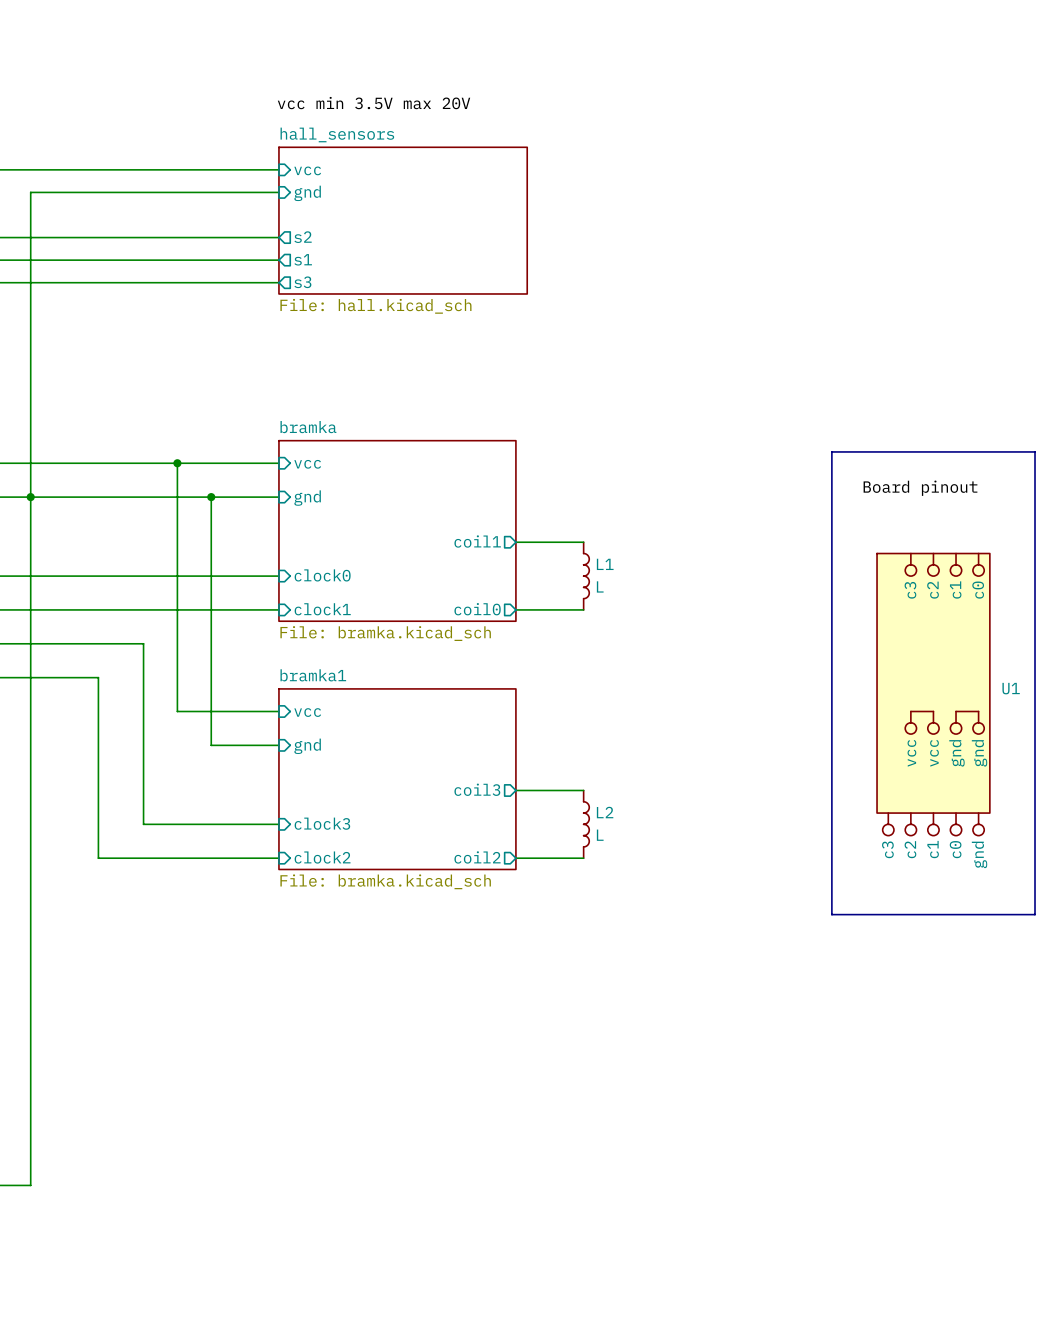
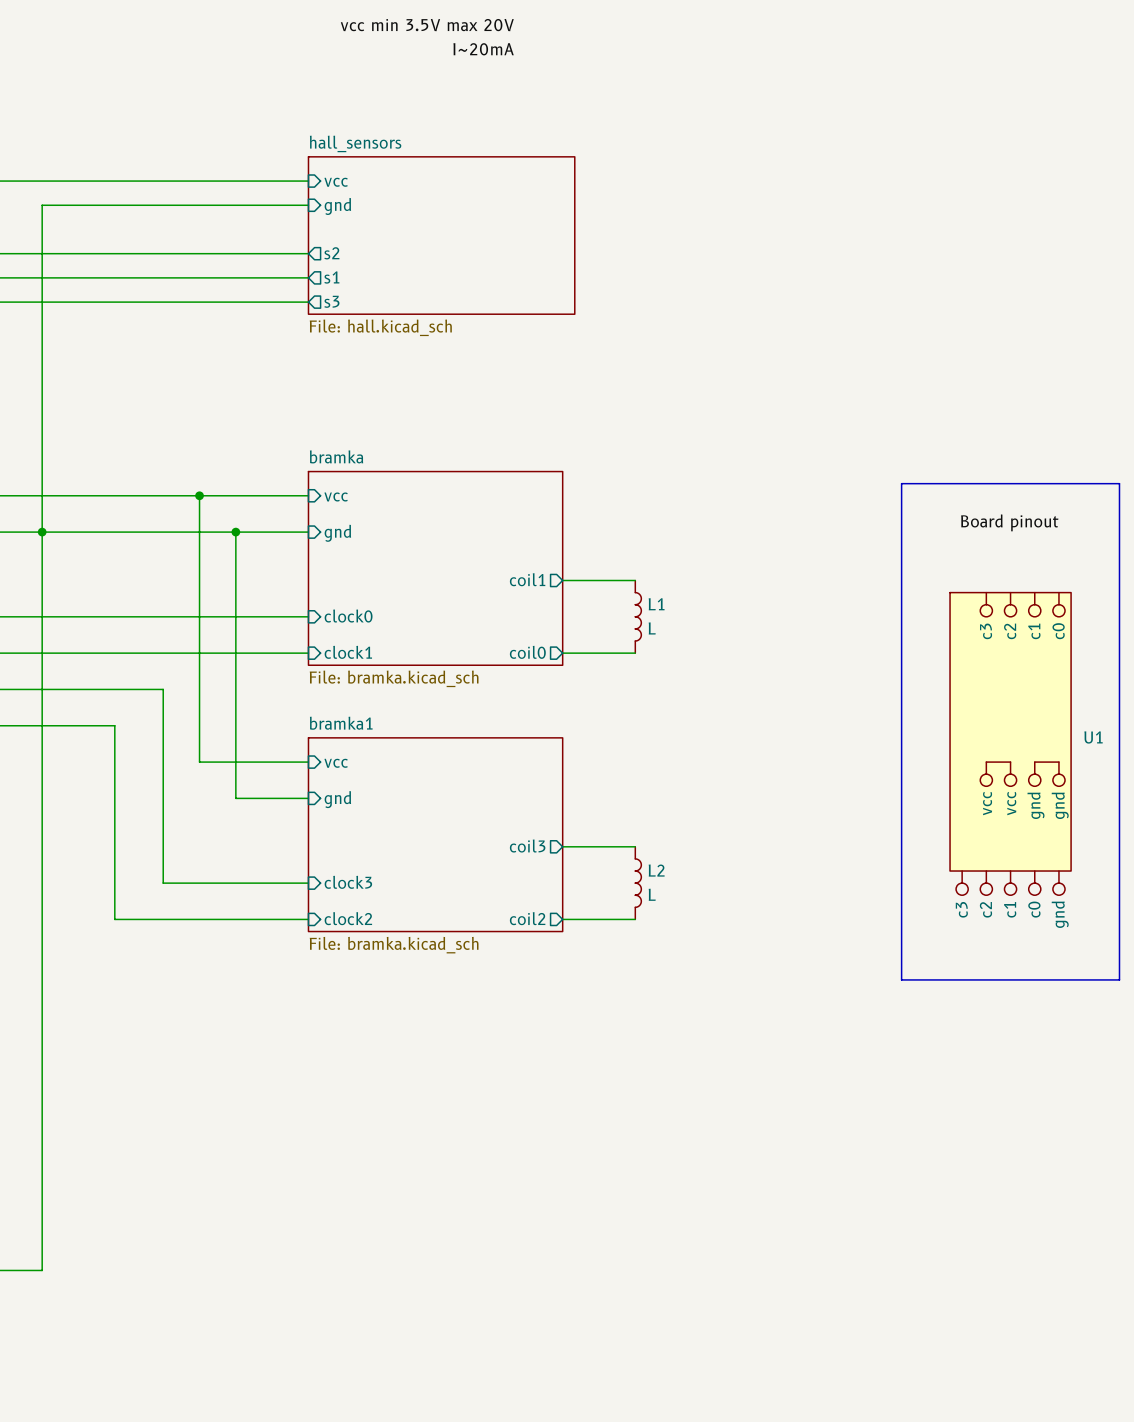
label: none -> I~20mA (483, 49)
label position: vcc min 3.5V max 20V (374, 103) -> vcc min 3.5V max 20V (427, 25)

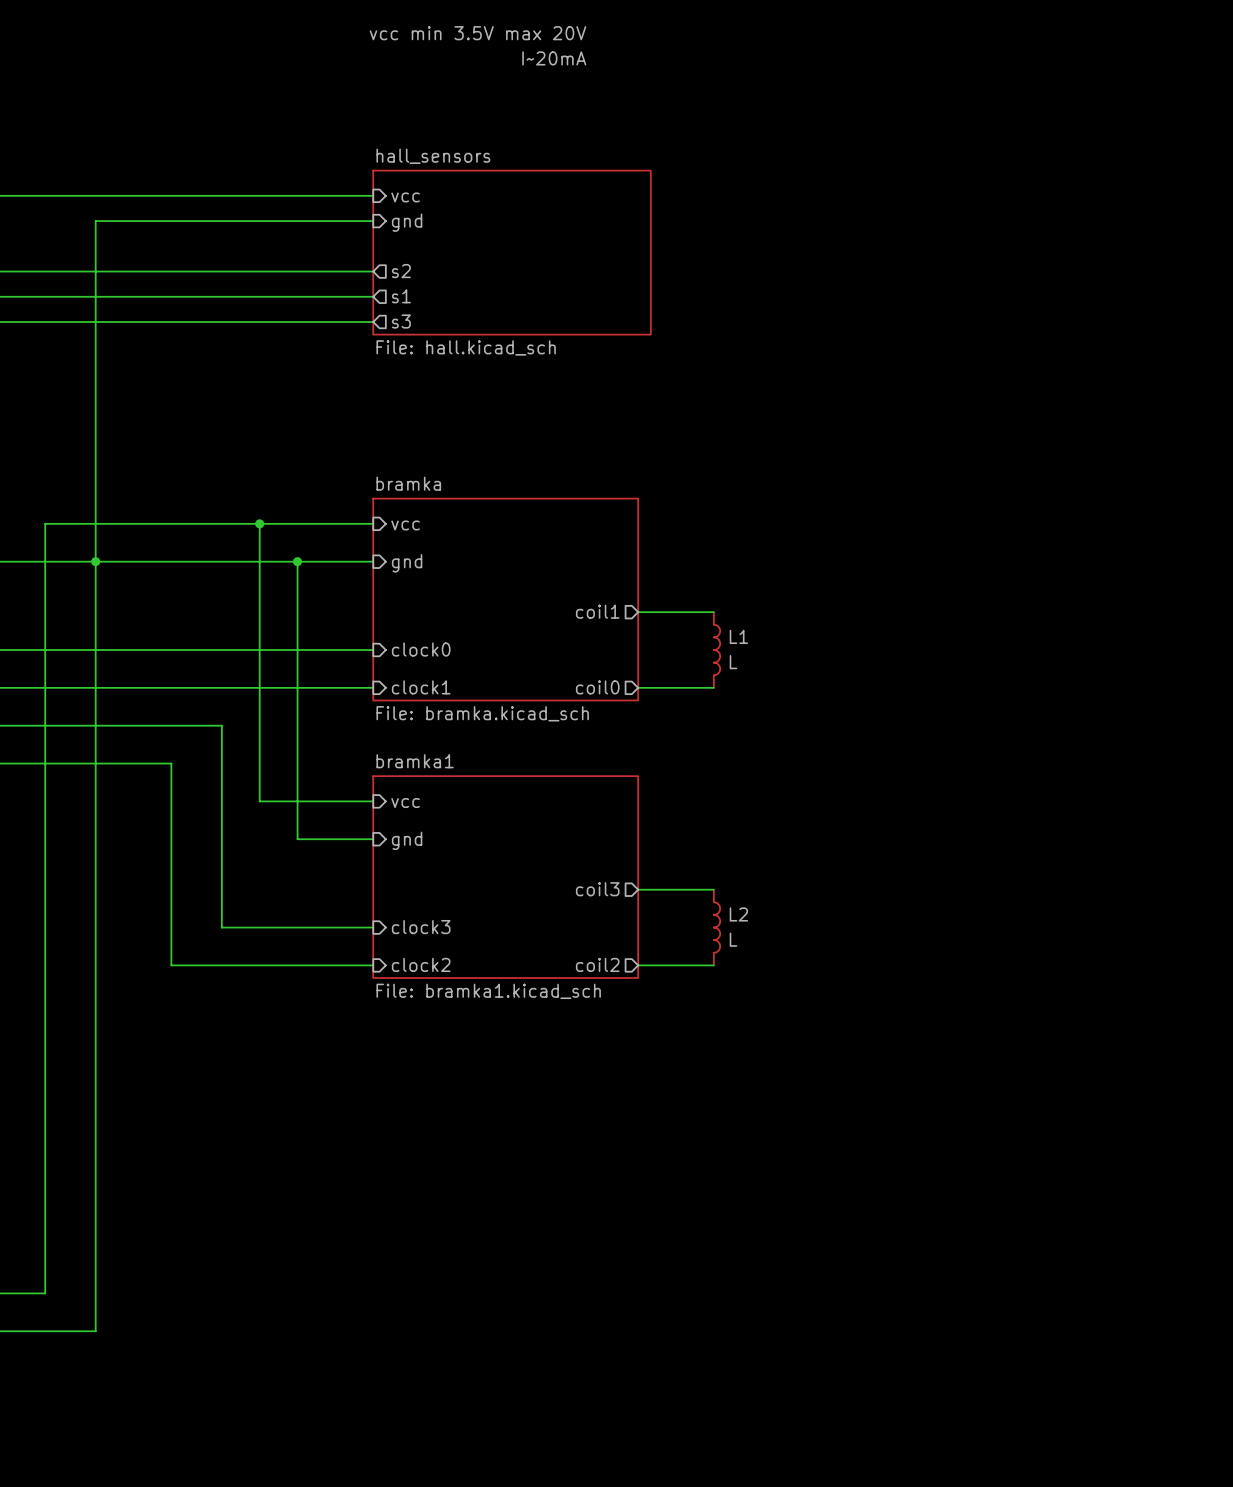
line: (901, 483) (1119, 483) (1119, 979) (901, 979) (901, 483) -> none
label: Board pinout (1009, 522) -> none
U1: (1010, 743) -> none
sheet bramka1 value: File: bramka.kicad_sch (394, 945) -> File: bramka1.kicad_sch (488, 991)

